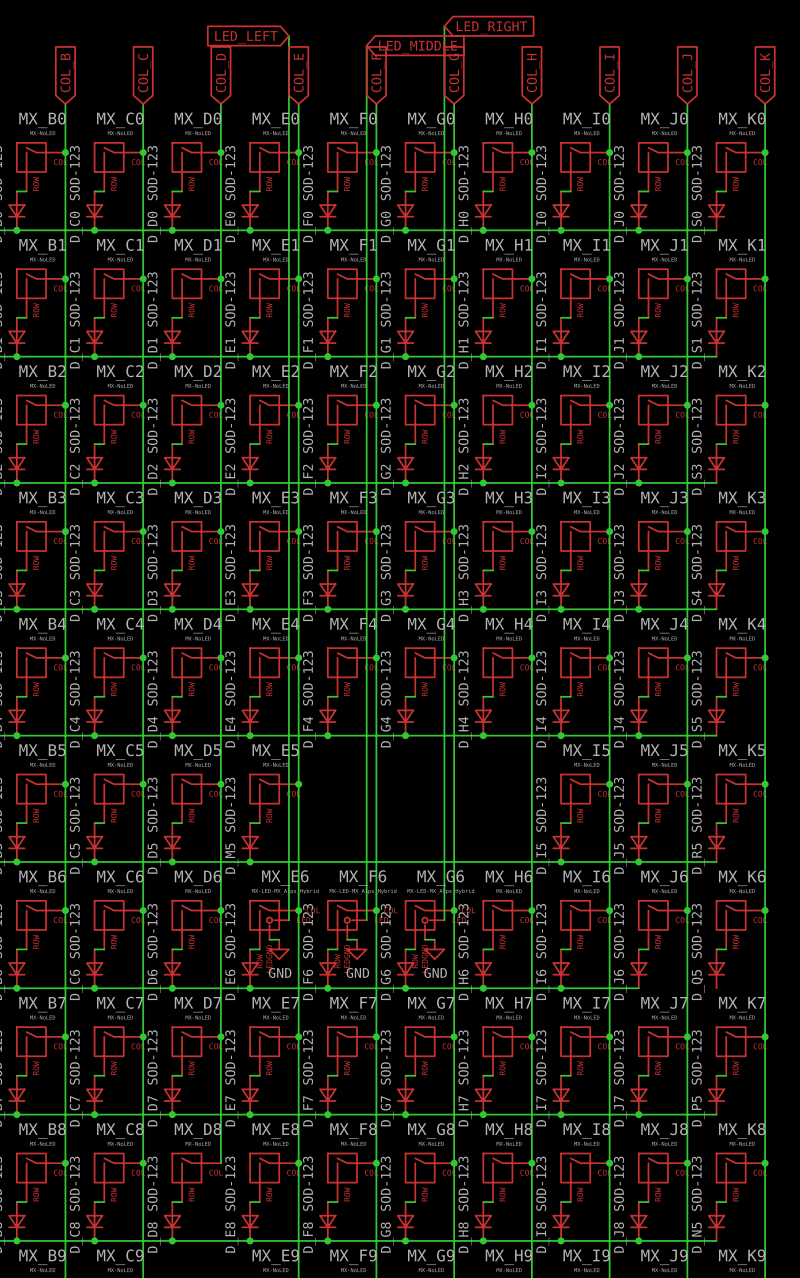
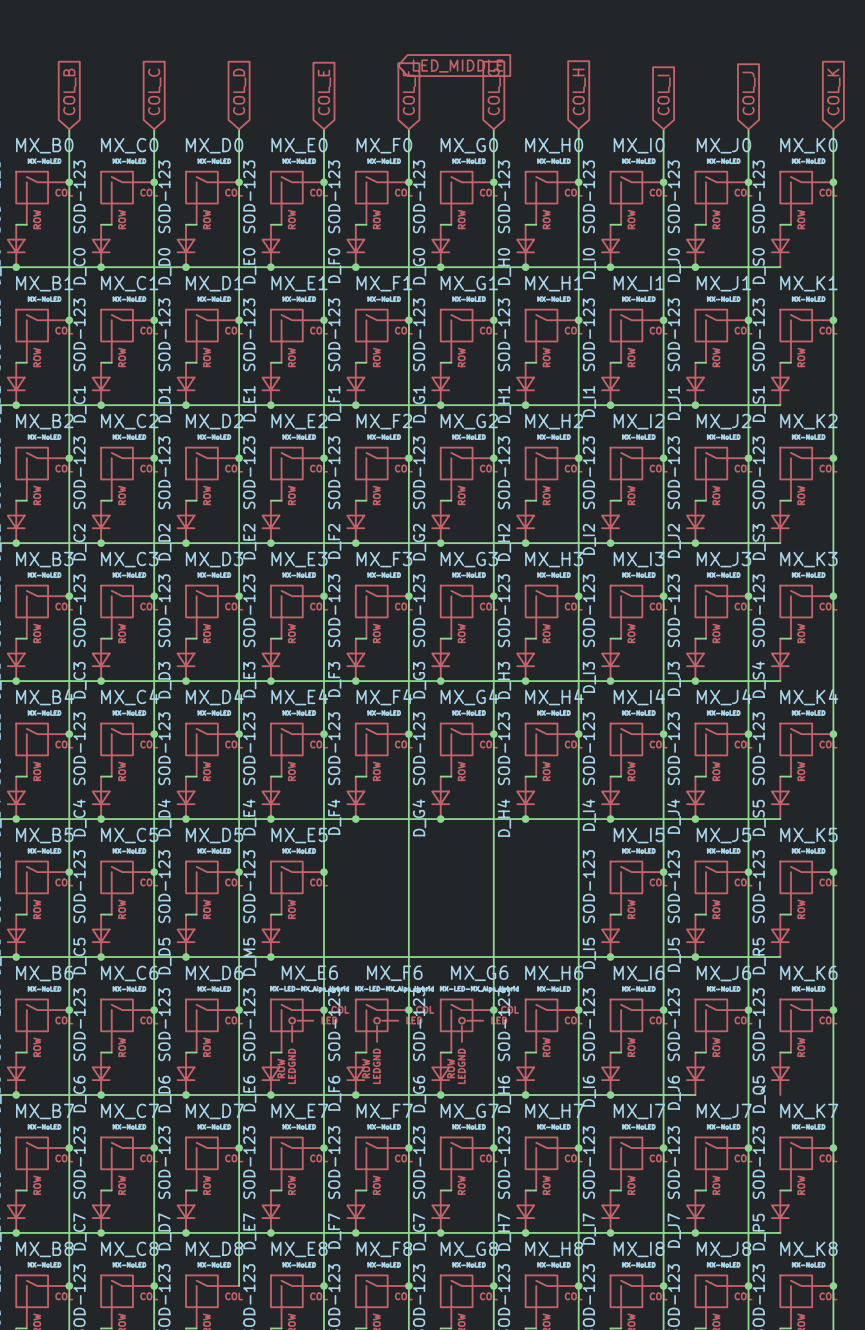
wire: (444, 26) (444, 920) -> none
global label: LED_RIGHT (492, 27) -> none
wire: (288, 35) (288, 920) -> none
global label: LED_LEFT (246, 37) -> none
wire: (366, 45) (366, 920) -> none
wire: (269, 939) (279, 939) -> none
wire: (347, 939) (356, 939) -> none
wire: (424, 939) (434, 939) -> none
power symbol: GND (279, 949) -> none
power symbol: GND (356, 949) -> none
power symbol: GND (434, 949) -> none

